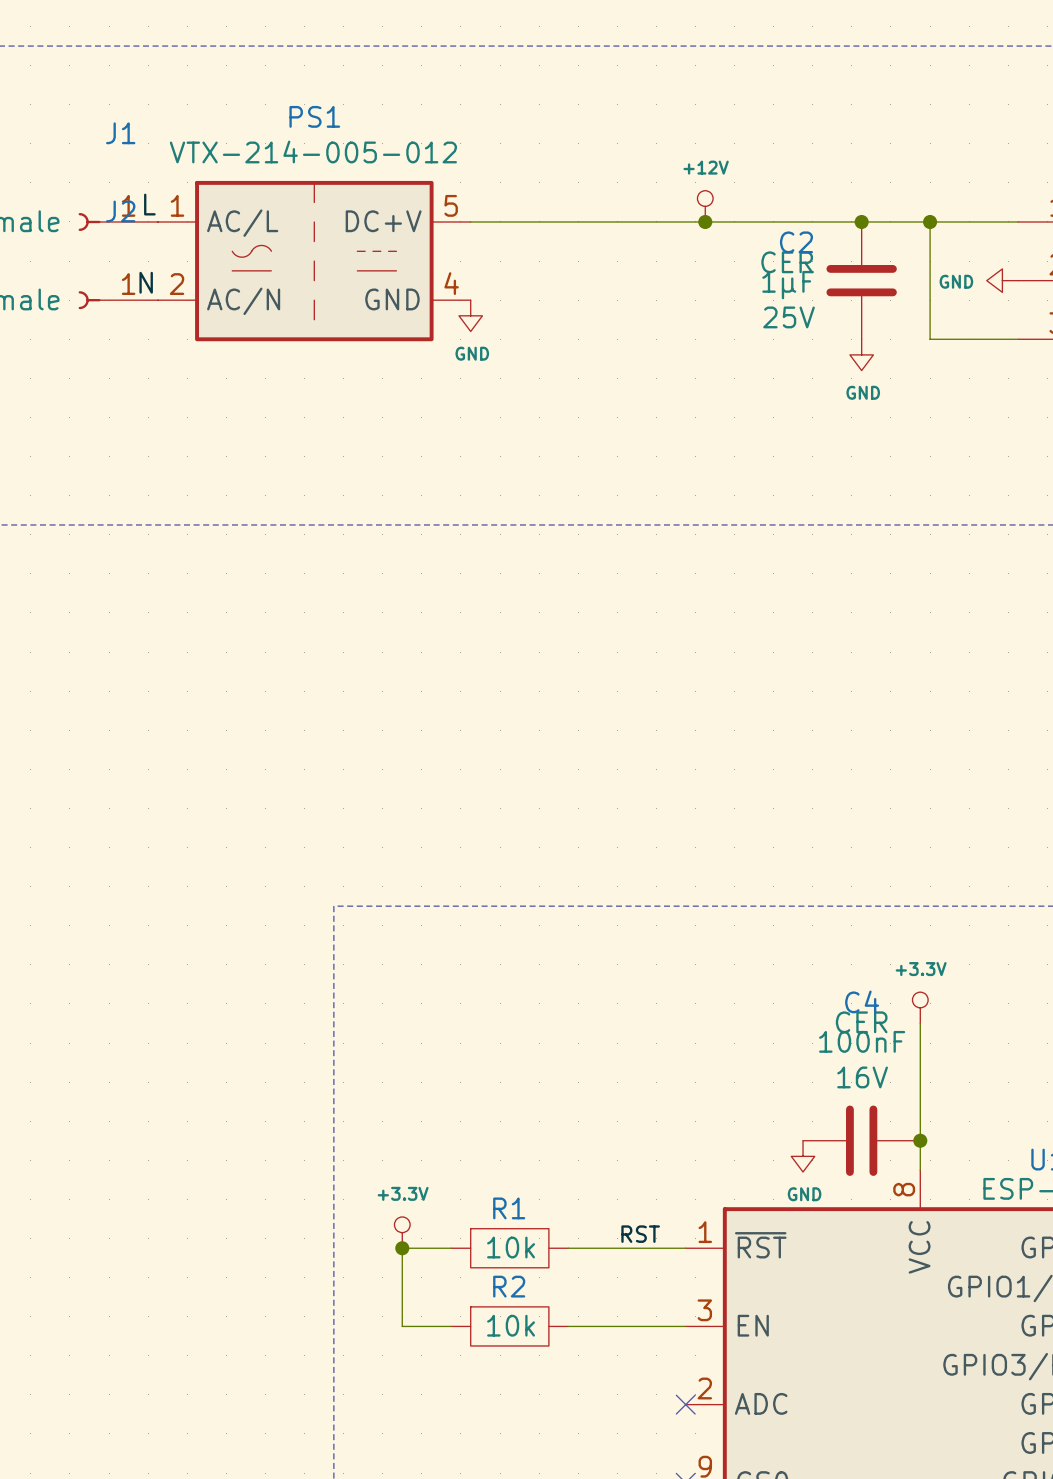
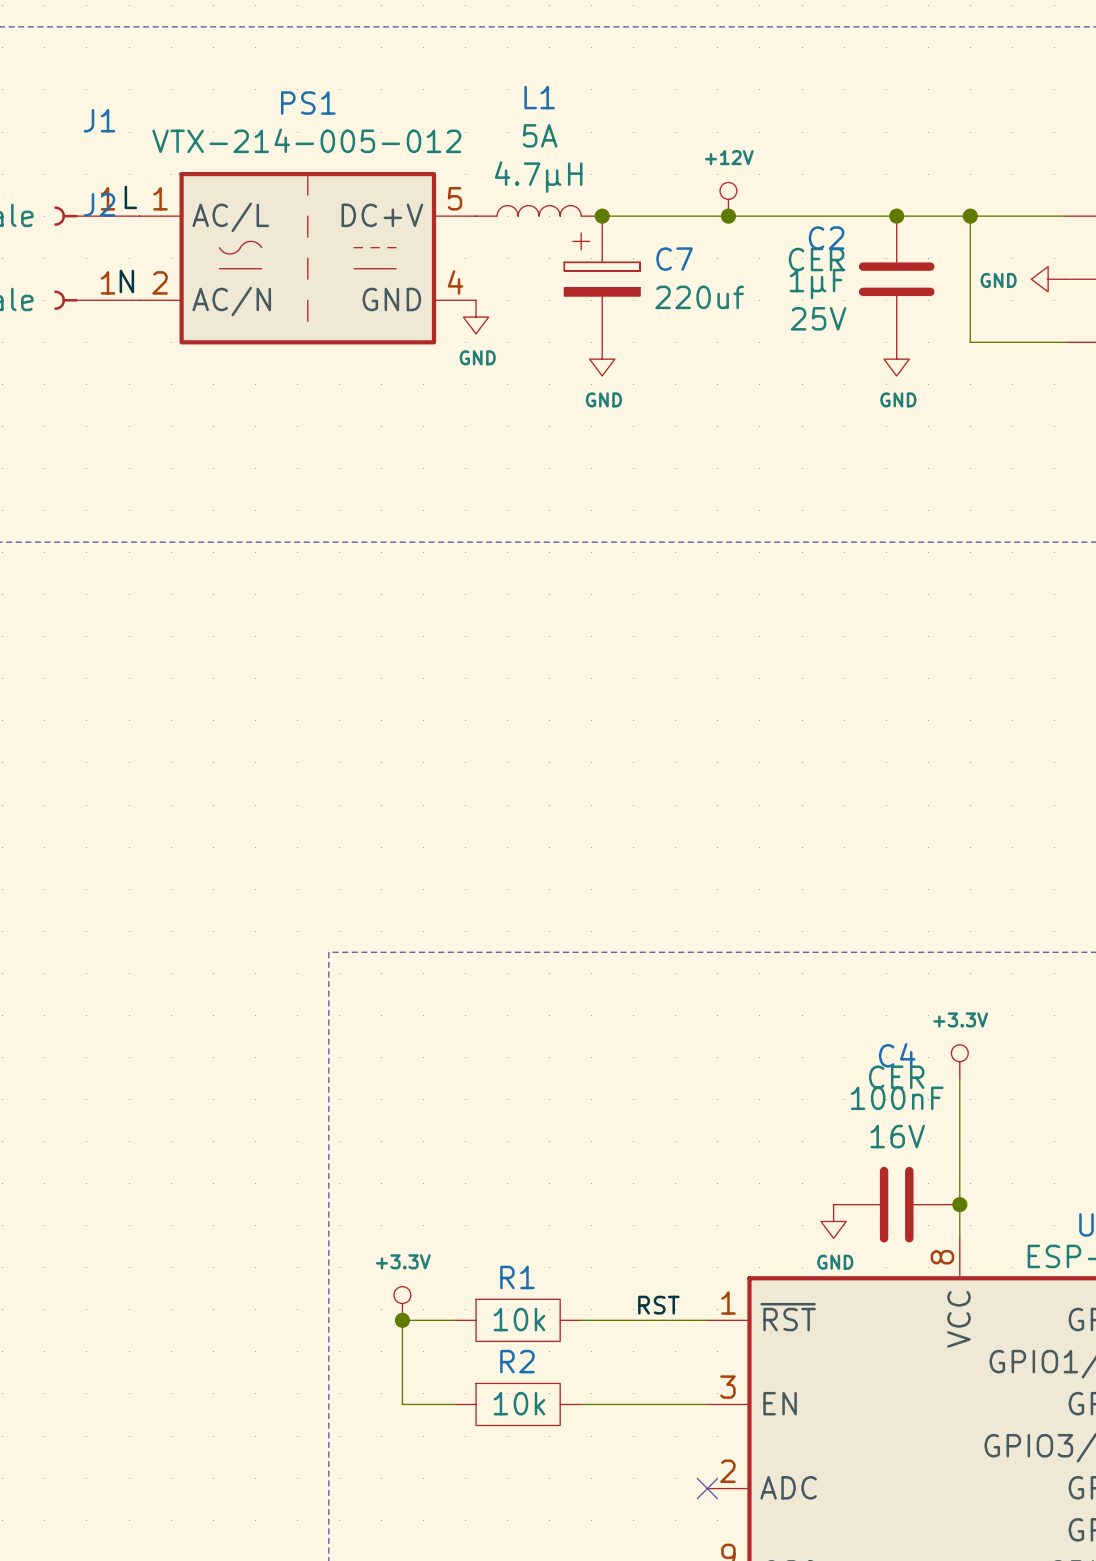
L1: none -> (539, 210)
wire: (470, 221) (587, 221) -> none
junction: none -> (602, 216)
C7: none -> 220uf (602, 279)
power symbol: none -> GND (602, 359)

